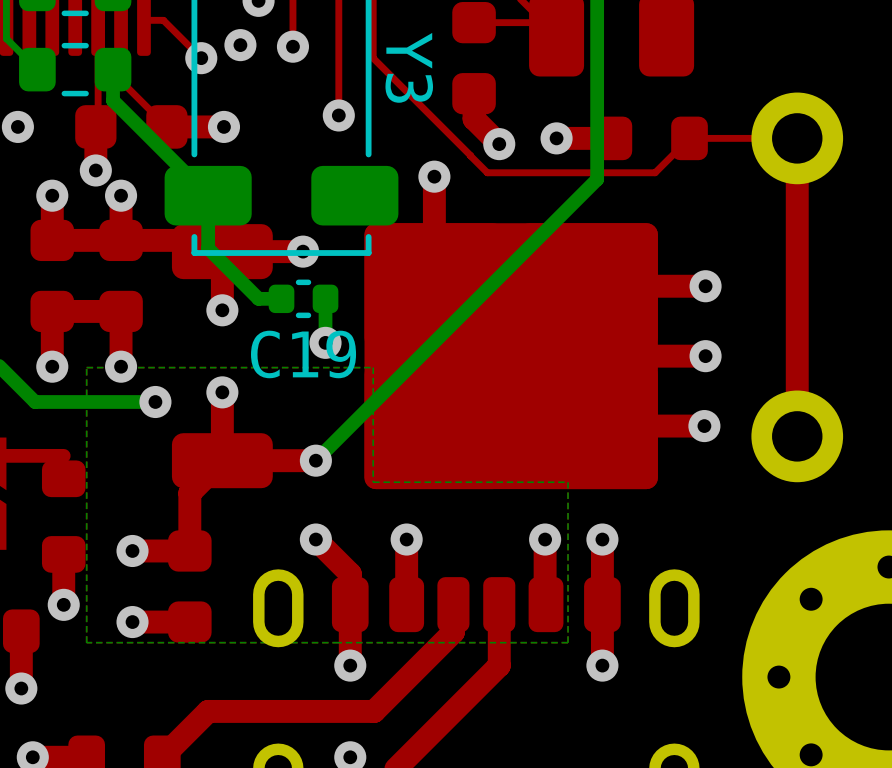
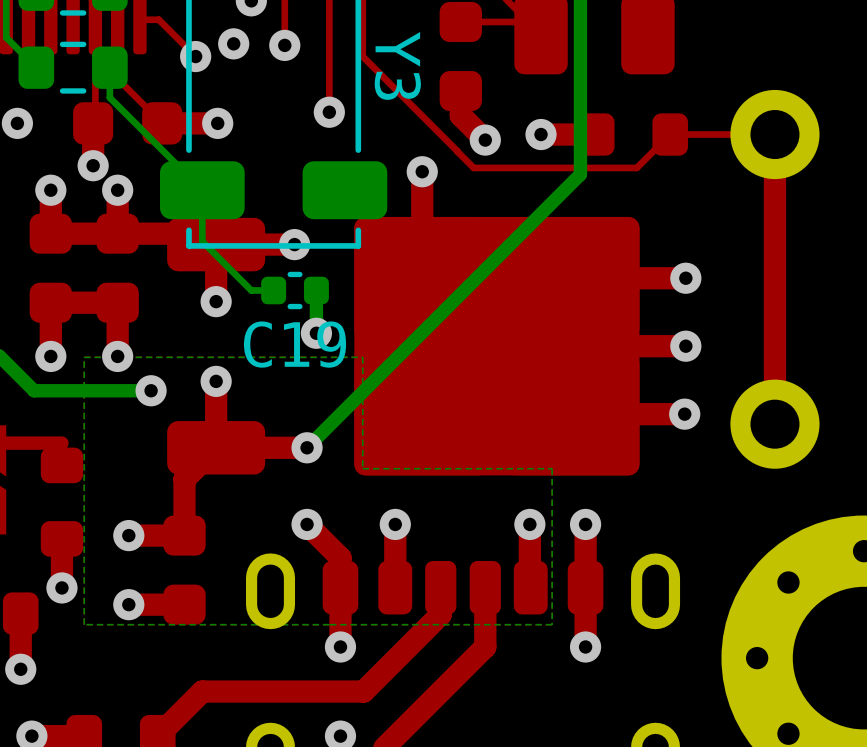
bottom track width: thick (113, 69) (113, 100) (208, 195) (208, 248) (258, 298) (281, 298) -> thin (109, 67) (109, 97) (202, 190) (202, 241) (251, 290) (273, 290)

